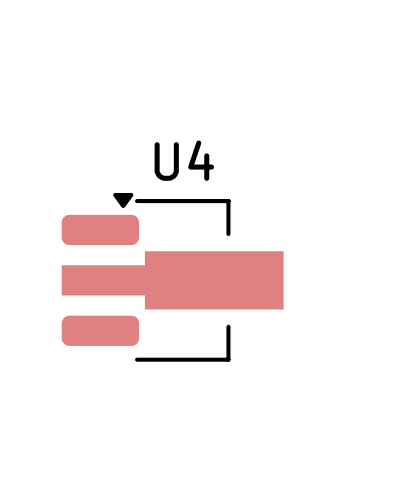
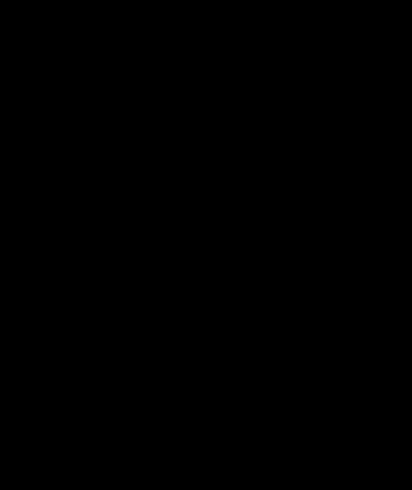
U4: (172, 277) -> none

